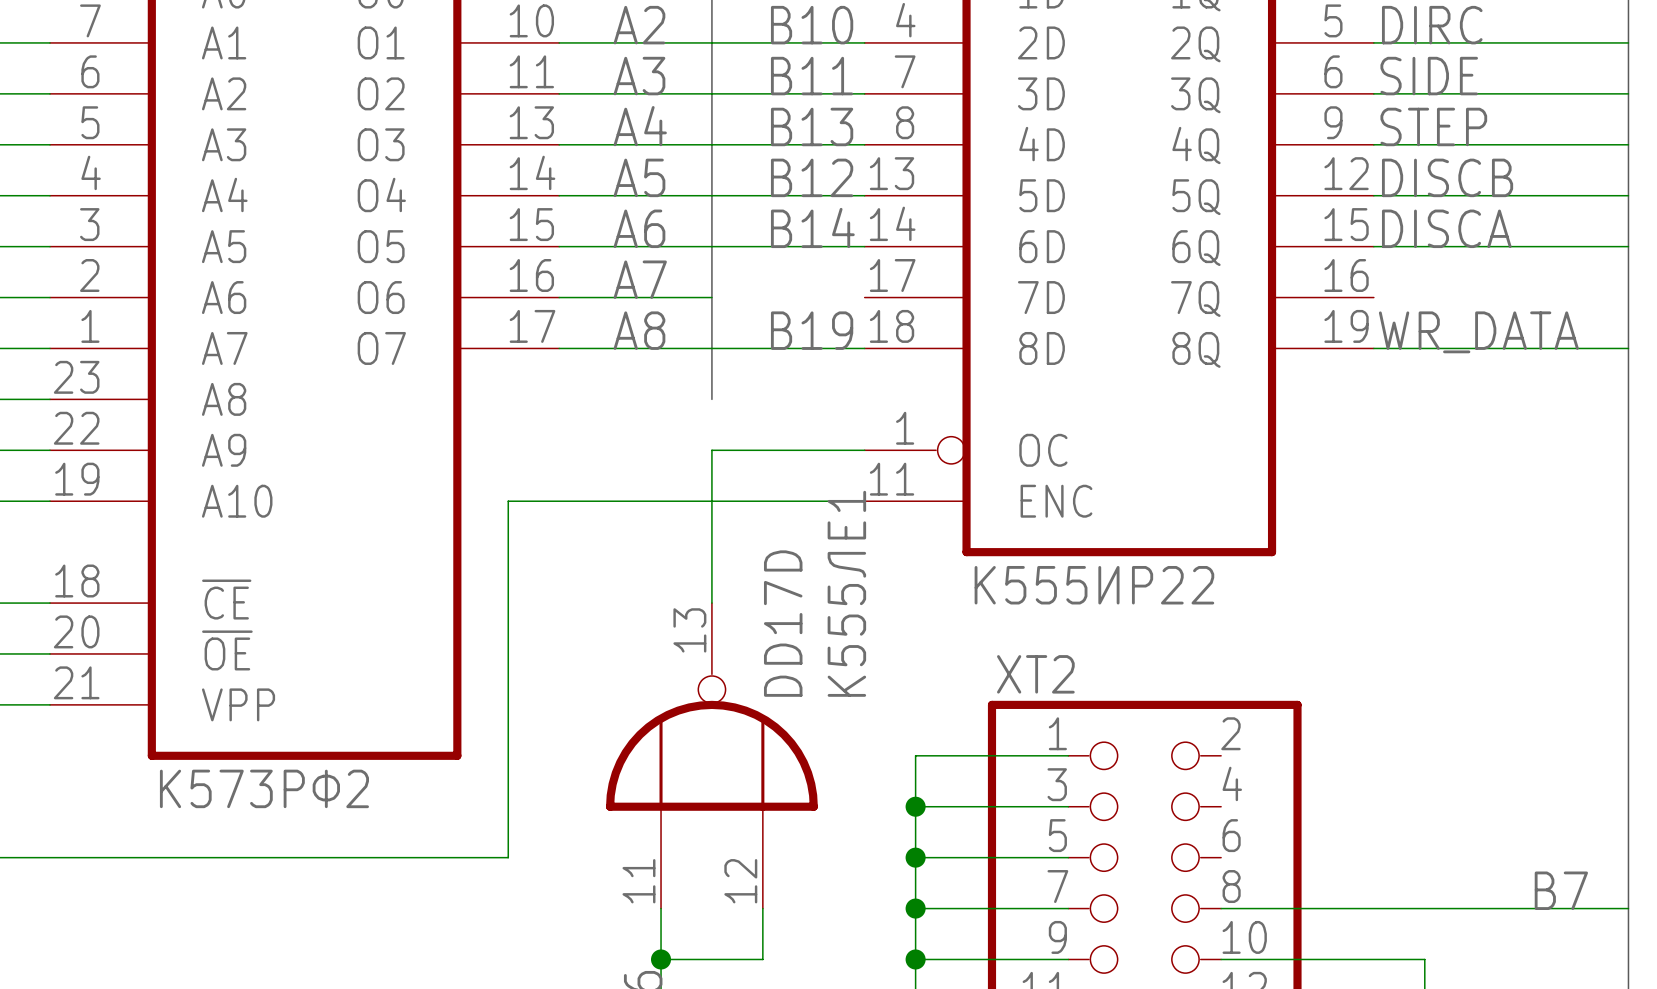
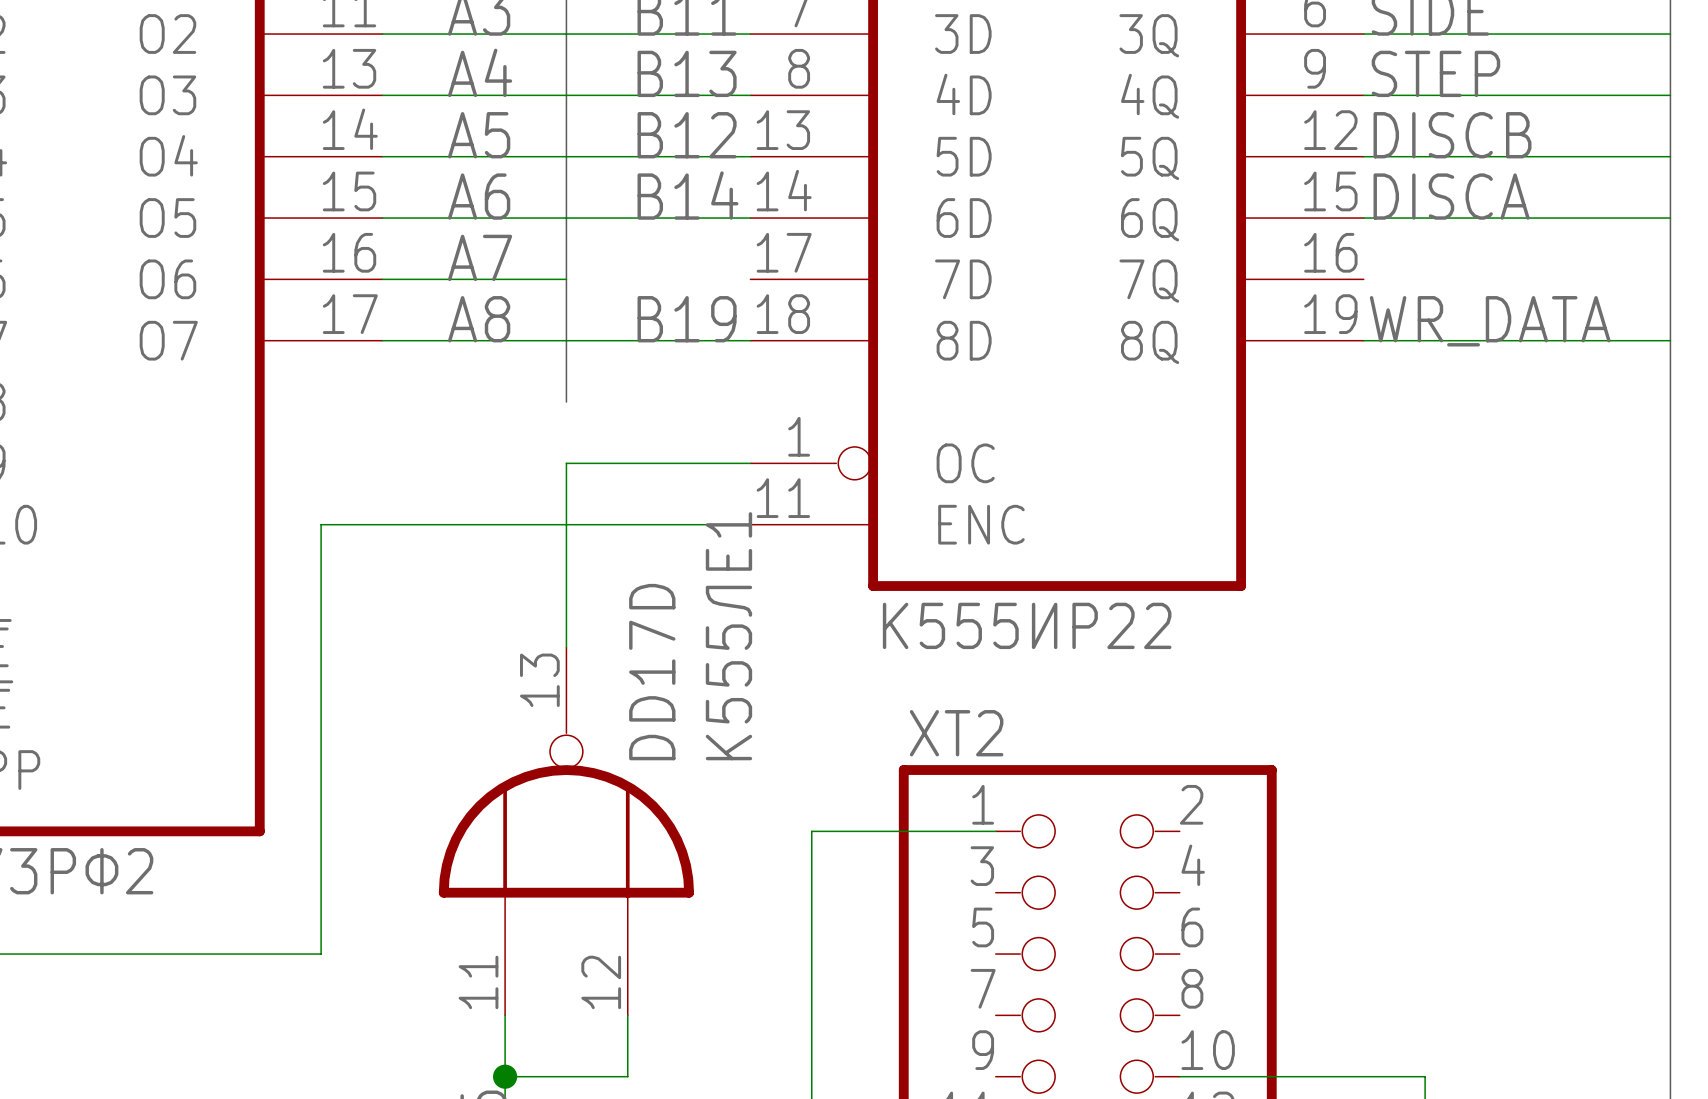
wire: (915, 806) (1068, 806) -> none
junction: (915, 806) -> none
wire: (915, 857) (1068, 857) -> none
junction: (915, 857) -> none
label: B7 (1561, 890) -> none
wire: (915, 908) (1068, 908) -> none
junction: (915, 908) -> none
wire: (1221, 908) (1628, 908) -> none
wire: (915, 959) (1068, 959) -> none
junction: (915, 959) -> none

